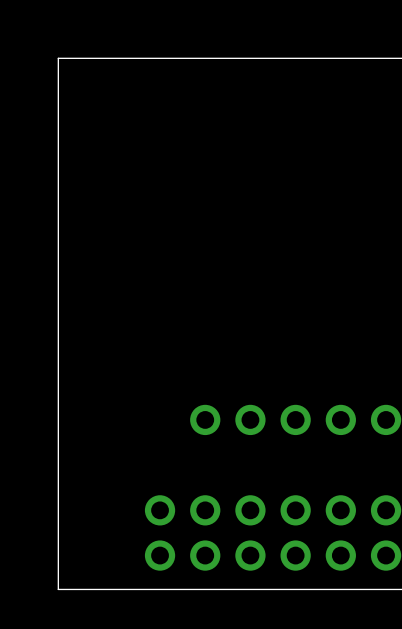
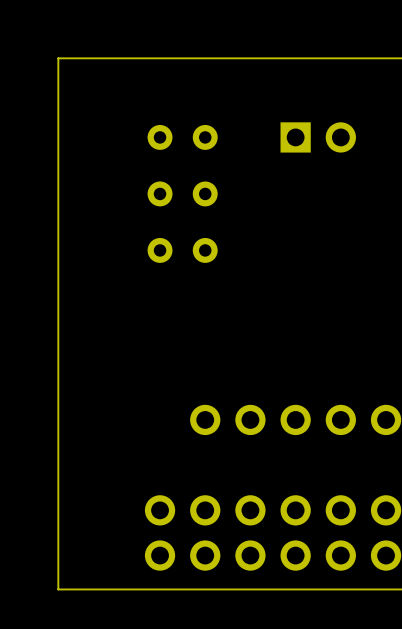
part: none -> (182, 137)
part: none -> (318, 137)
part: none -> (182, 193)
part: none -> (182, 250)

